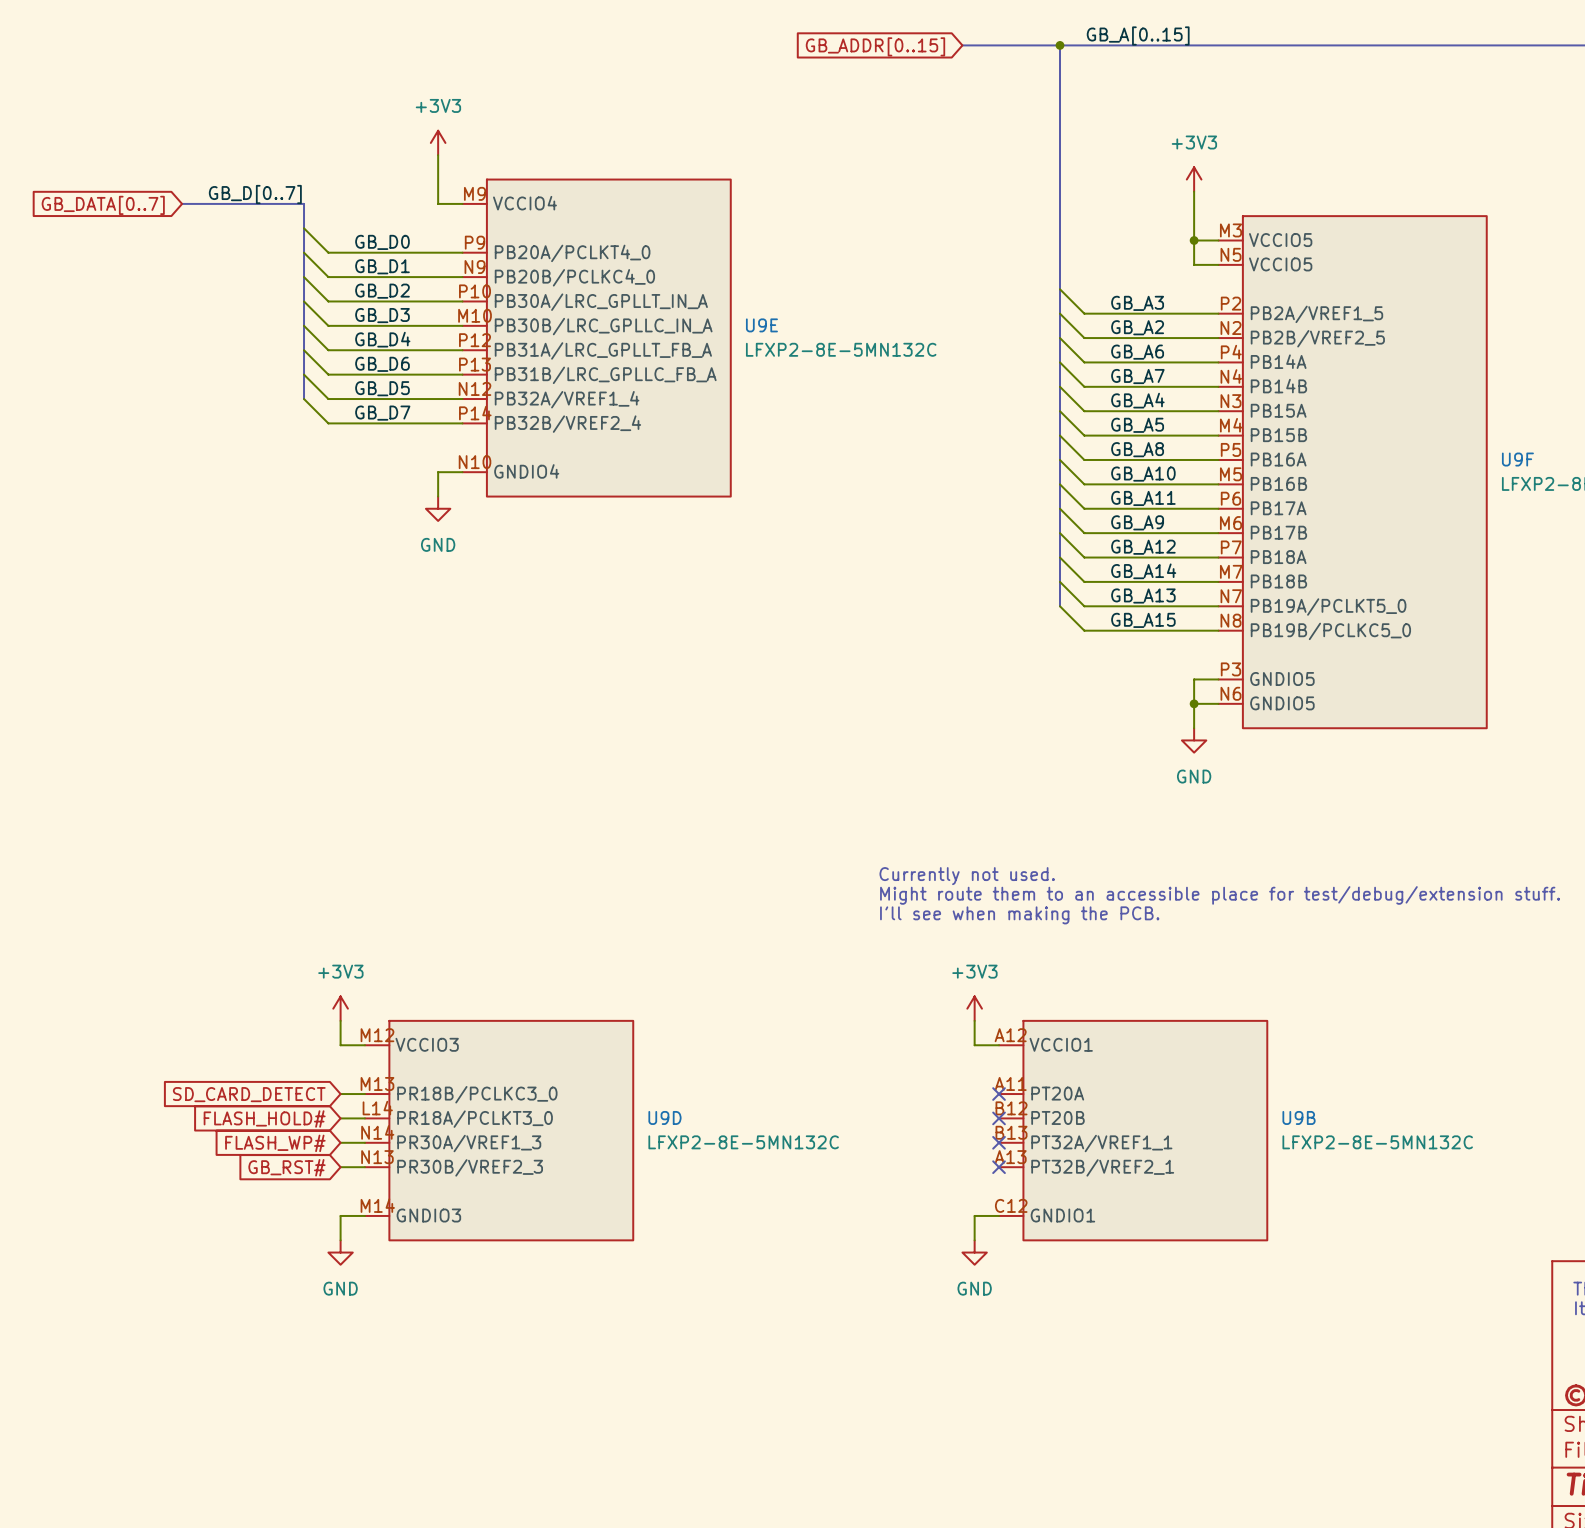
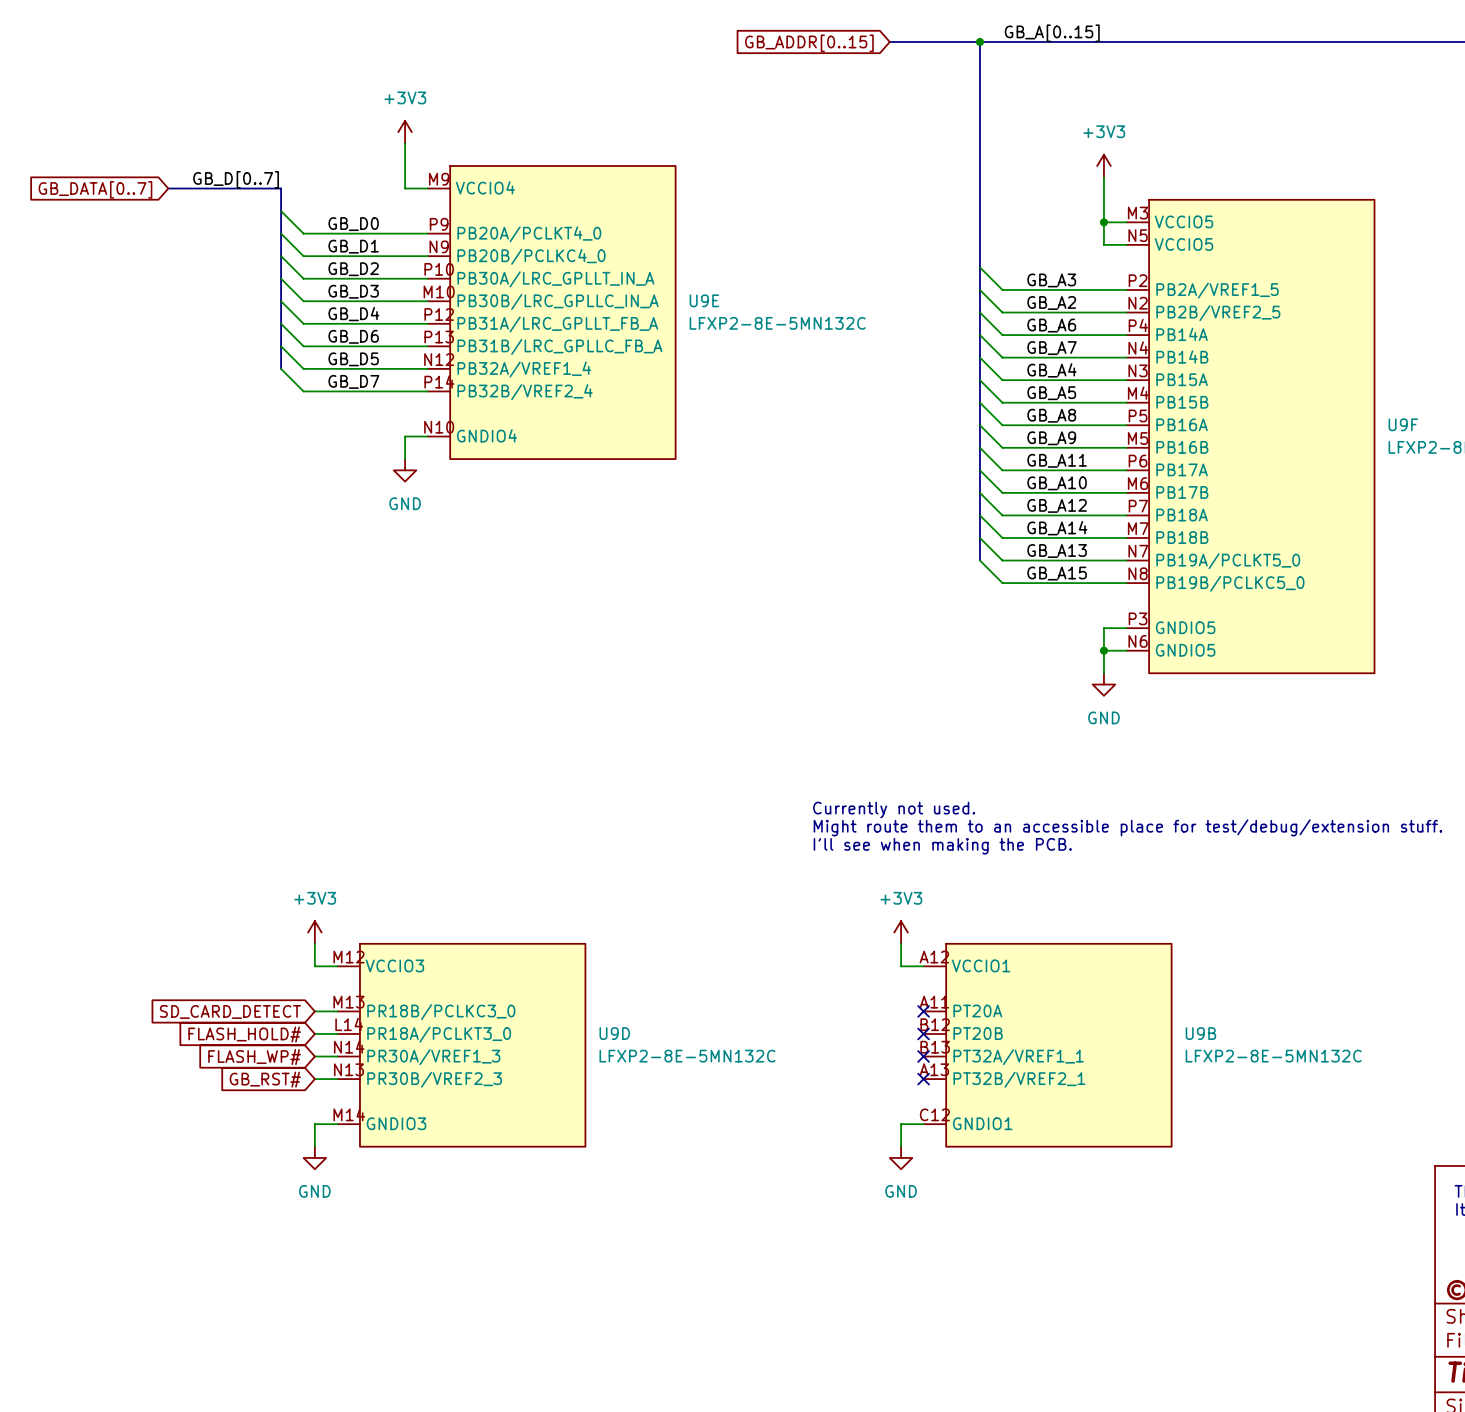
label: GB_A10 (1143, 474) -> GB_A9 (1051, 438)
label: GB_A9 (1137, 522) -> GB_A10 (1057, 483)

